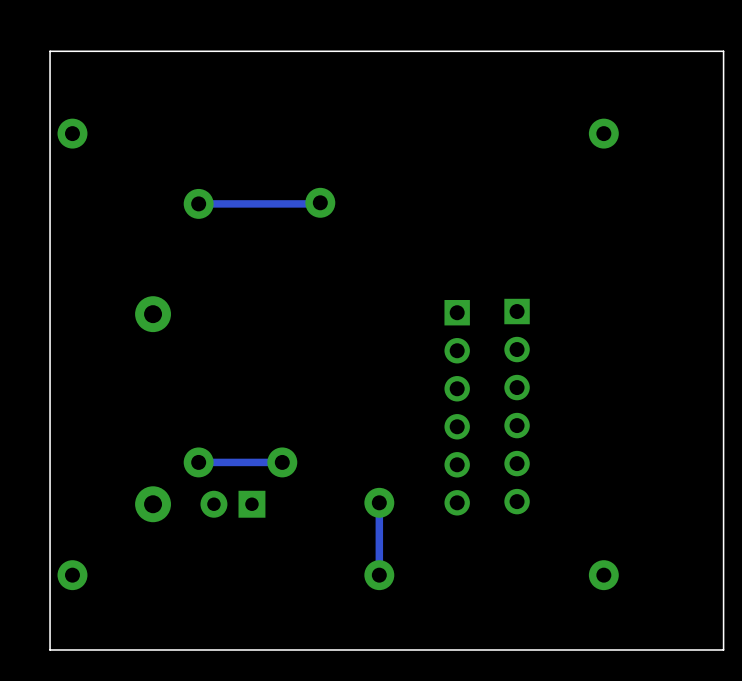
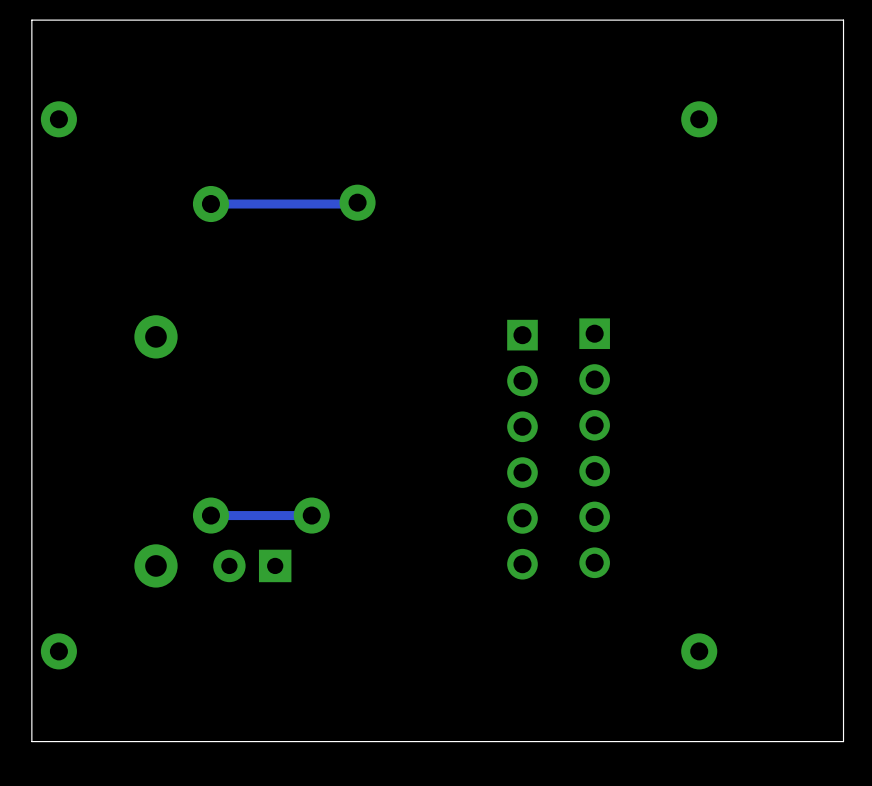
track: (379, 502) (379, 575) -> none
via: (379, 502) -> none
via: (379, 575) -> none

